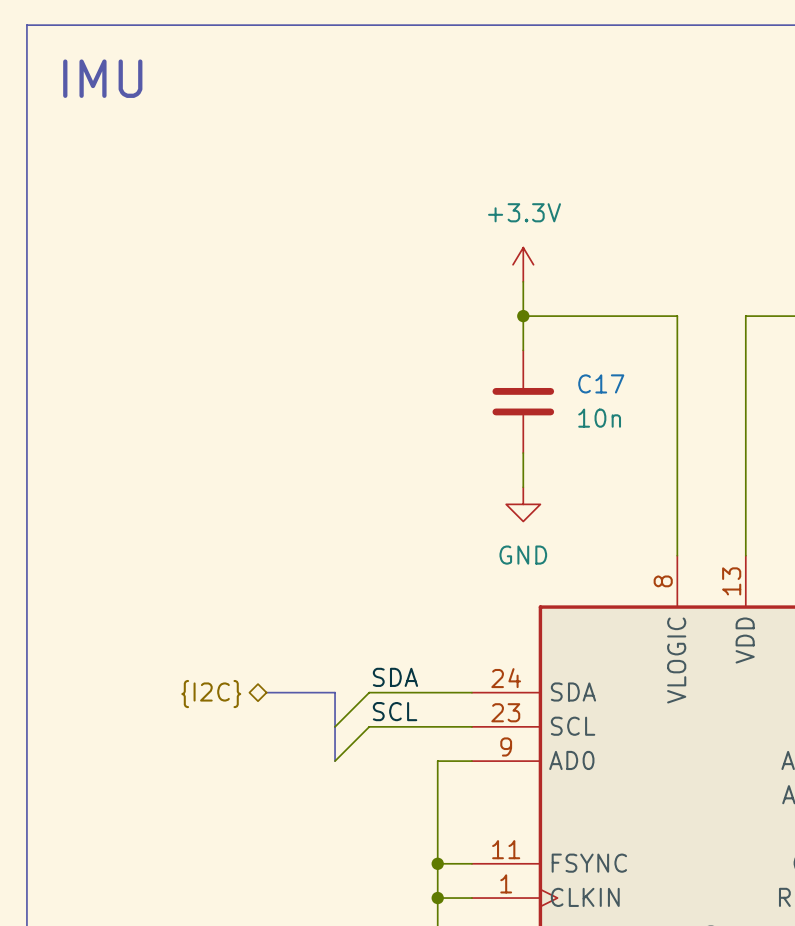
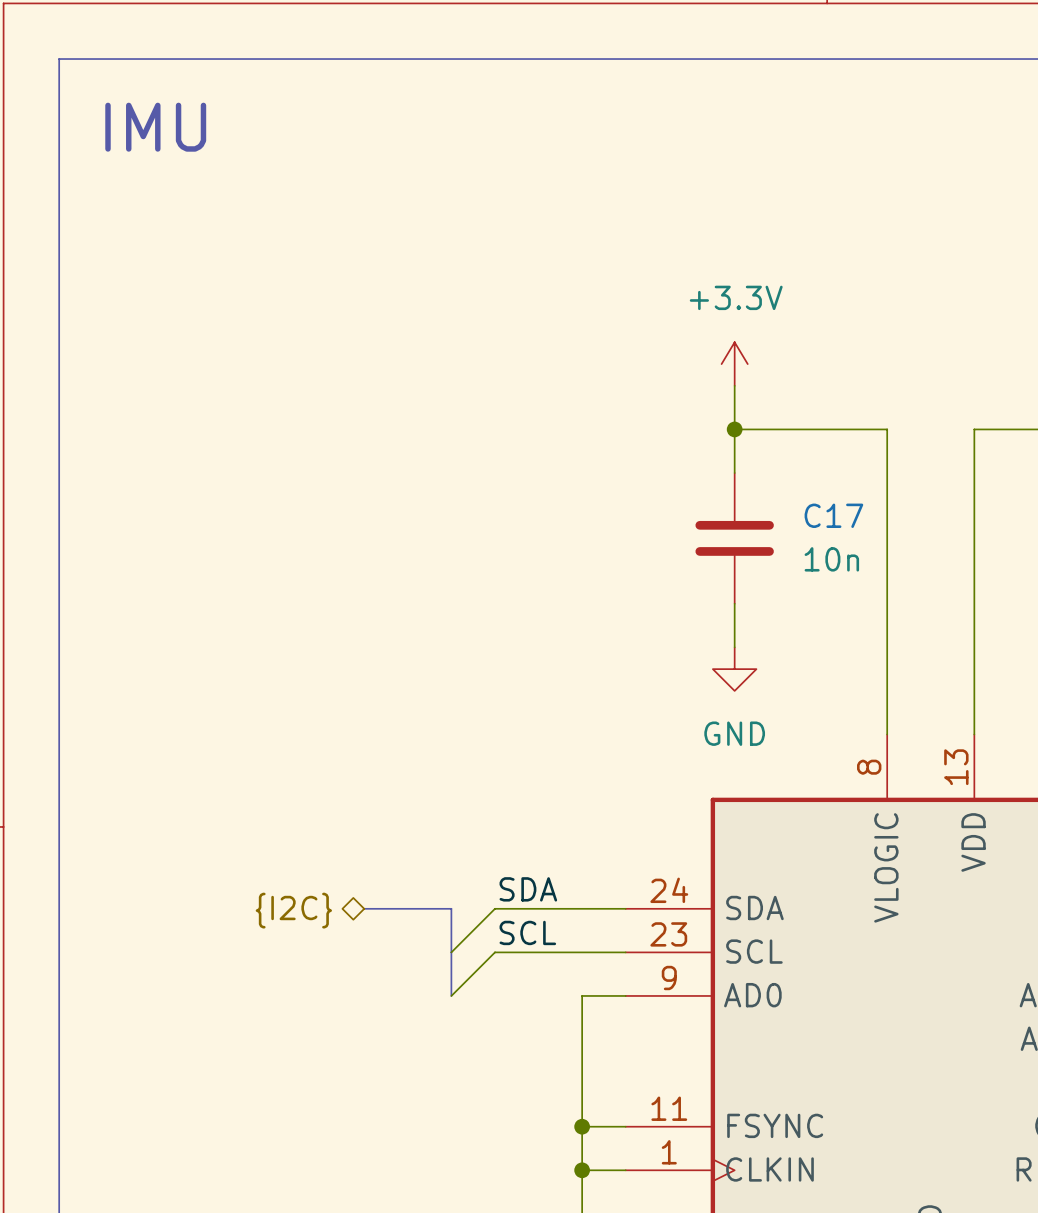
power symbol position: +3.3V (523, 264) -> +3.3V (734, 364)
wire: (523, 281) (523, 350) -> (734, 385) (734, 473)
wire: (523, 316) (557, 316) -> none
junction position: (523, 316) -> (734, 429)
C17 position: (523, 401) -> (734, 538)
wire: (523, 453) (523, 487) -> (734, 603) (734, 647)
power symbol position: GND (523, 504) -> GND (734, 669)

